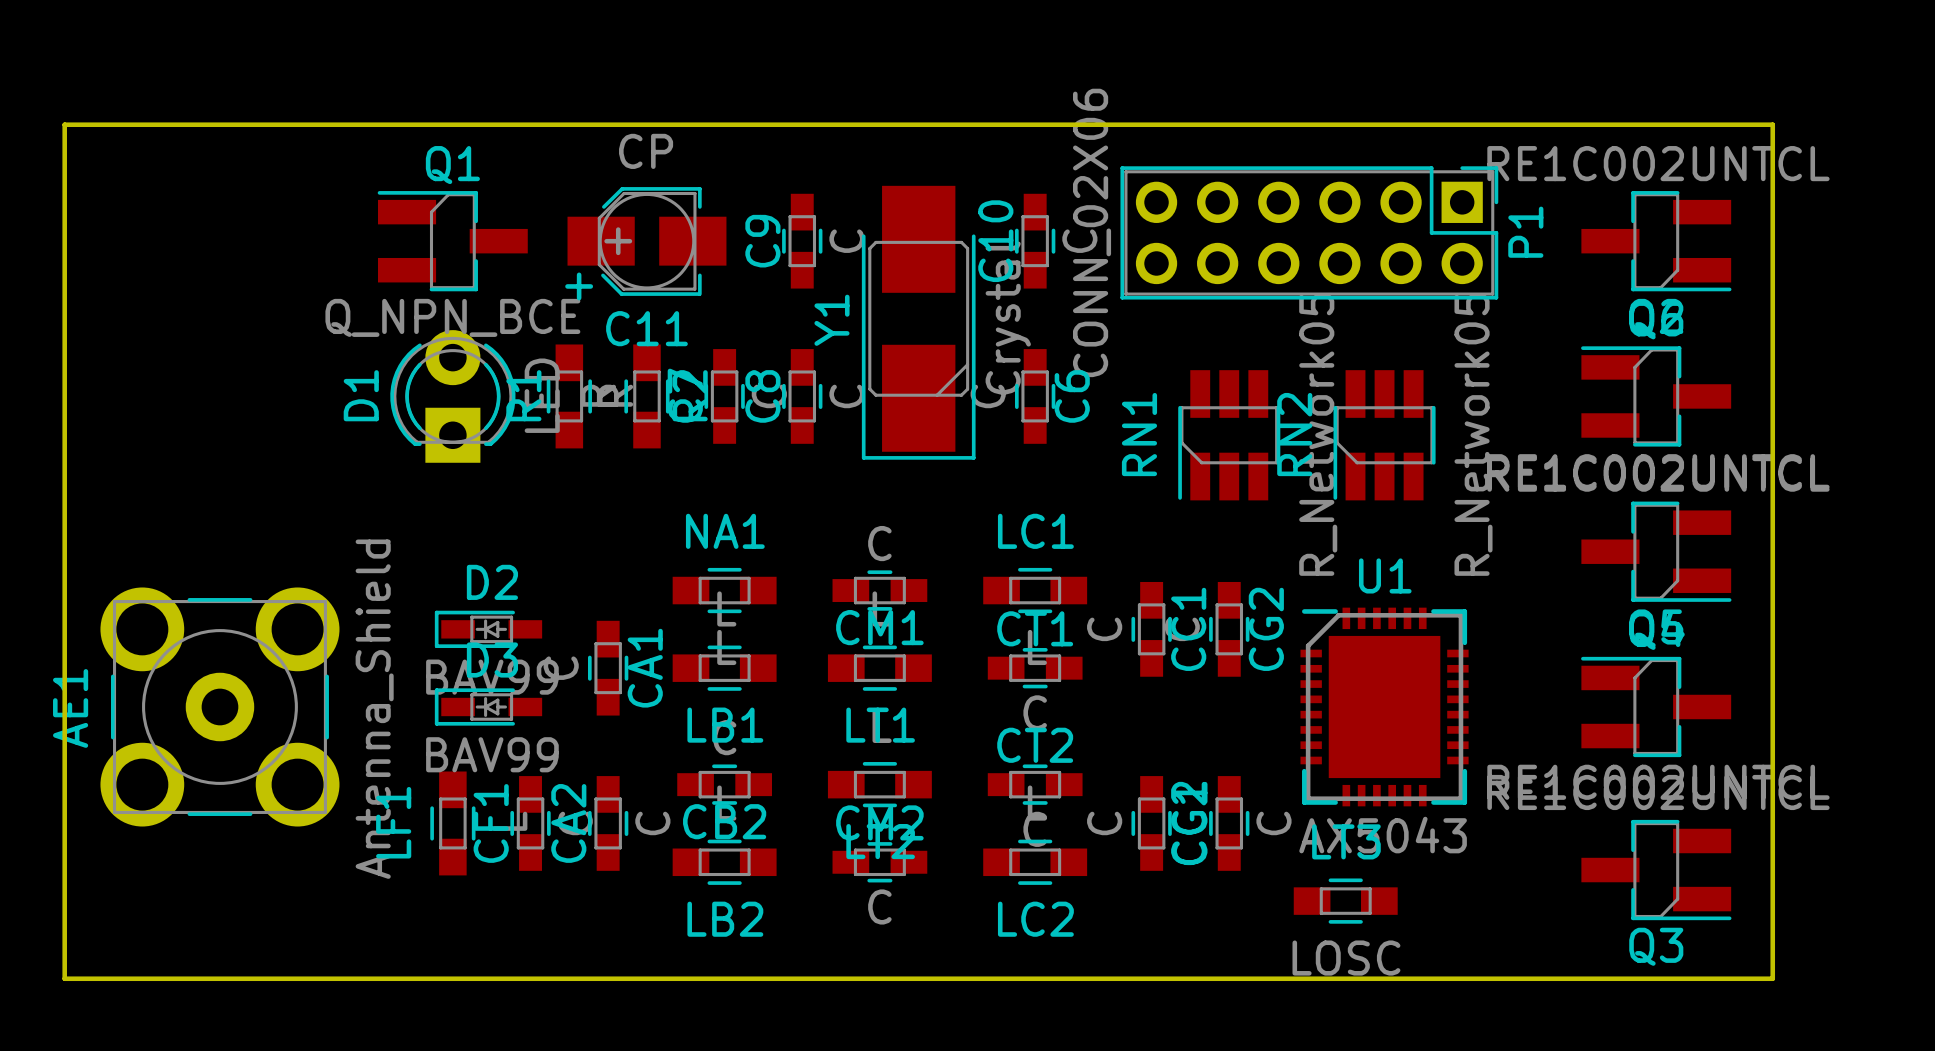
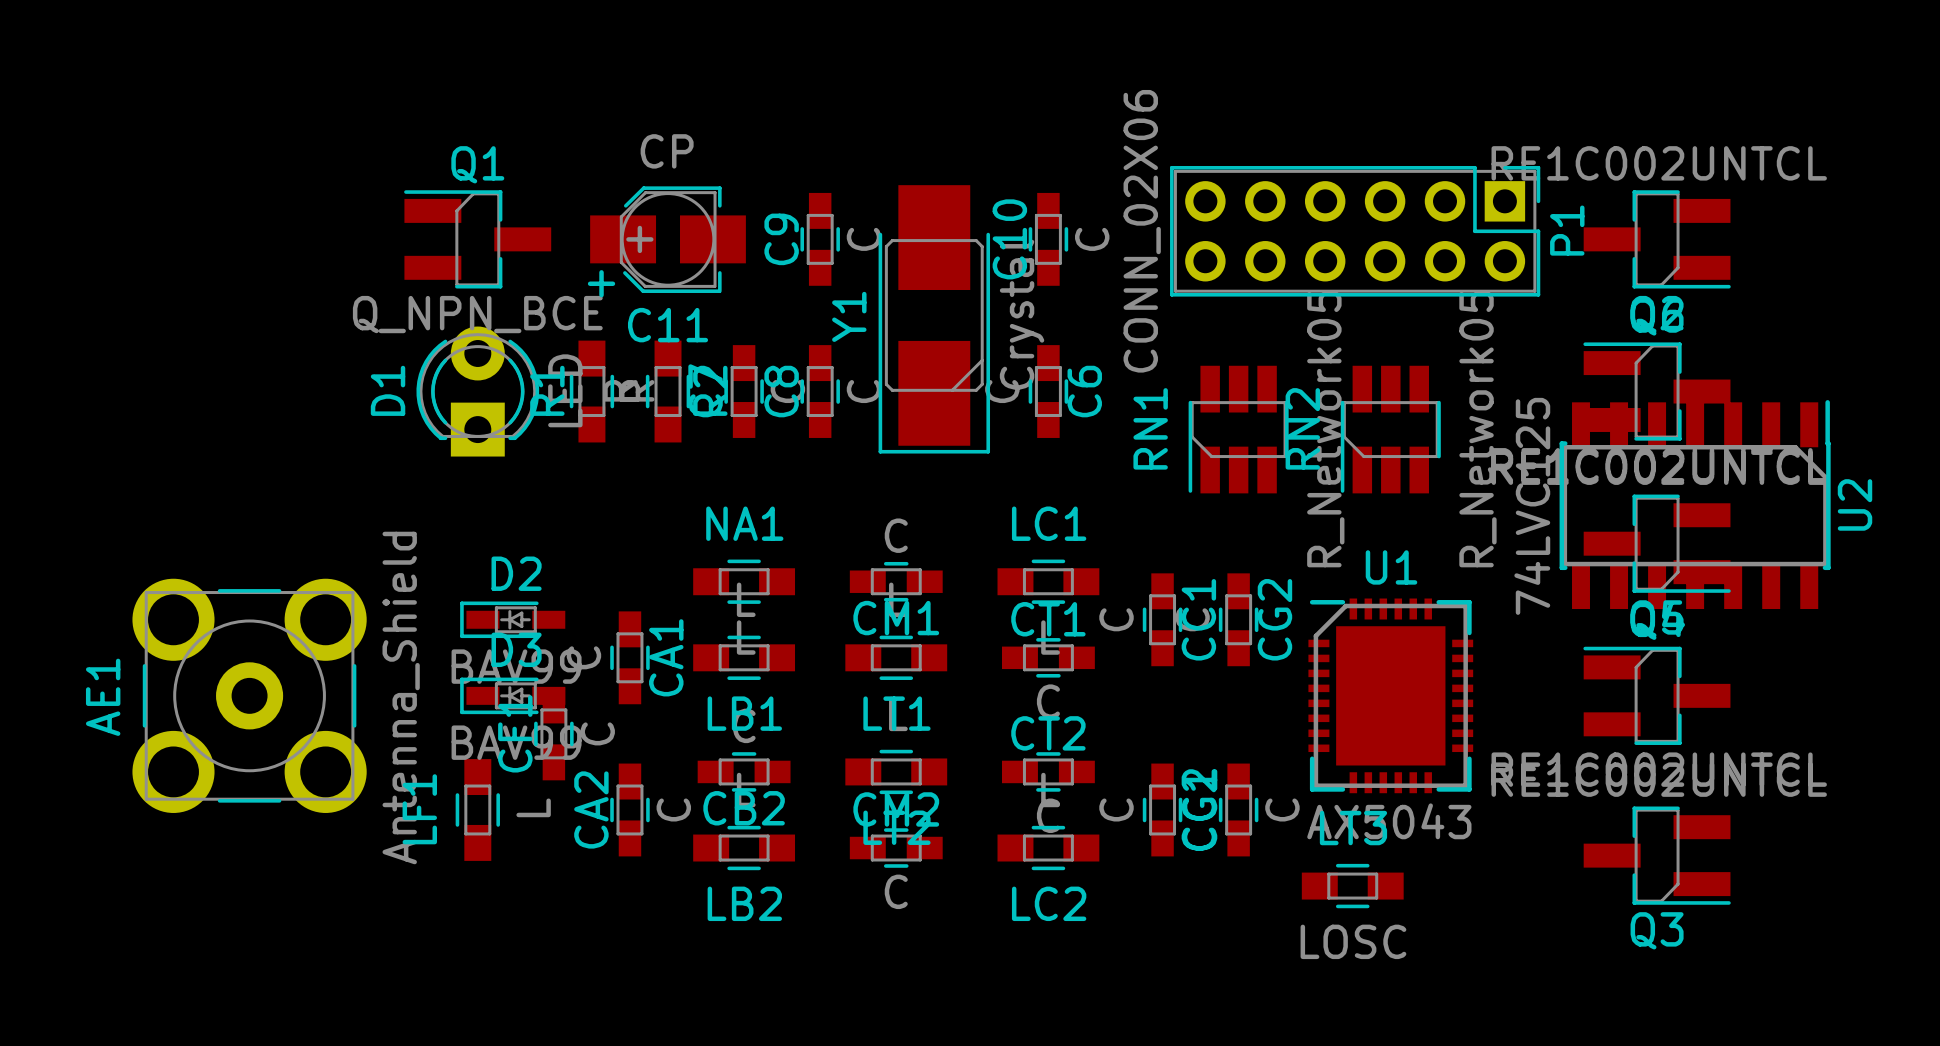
board edge: (64, 124) (64, 978) (1772, 978) (1772, 124) (64, 124) -> none
P1 position: (1309, 232) -> (1355, 231)
U2: none -> 74LVC125 (1695, 504)
CF1 position: (530, 823) -> (553, 733)

